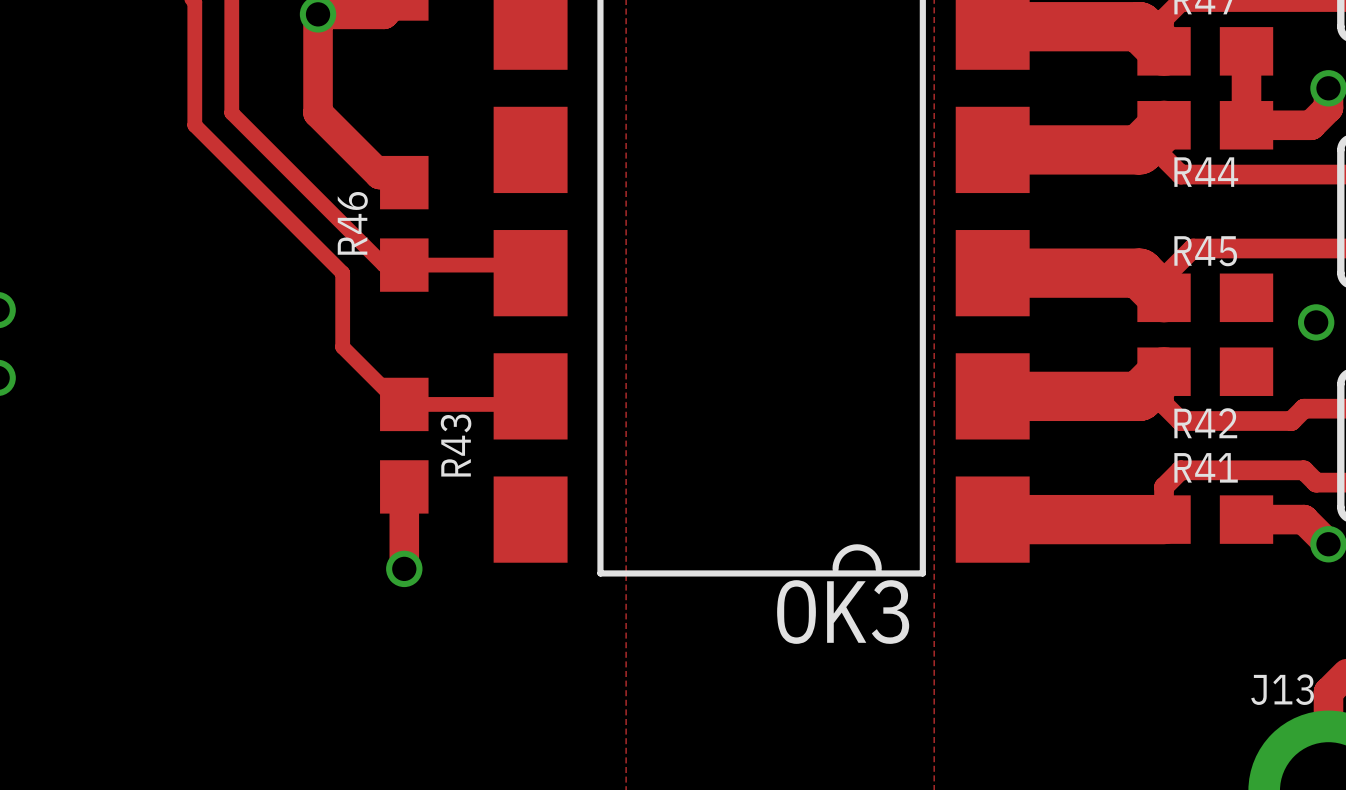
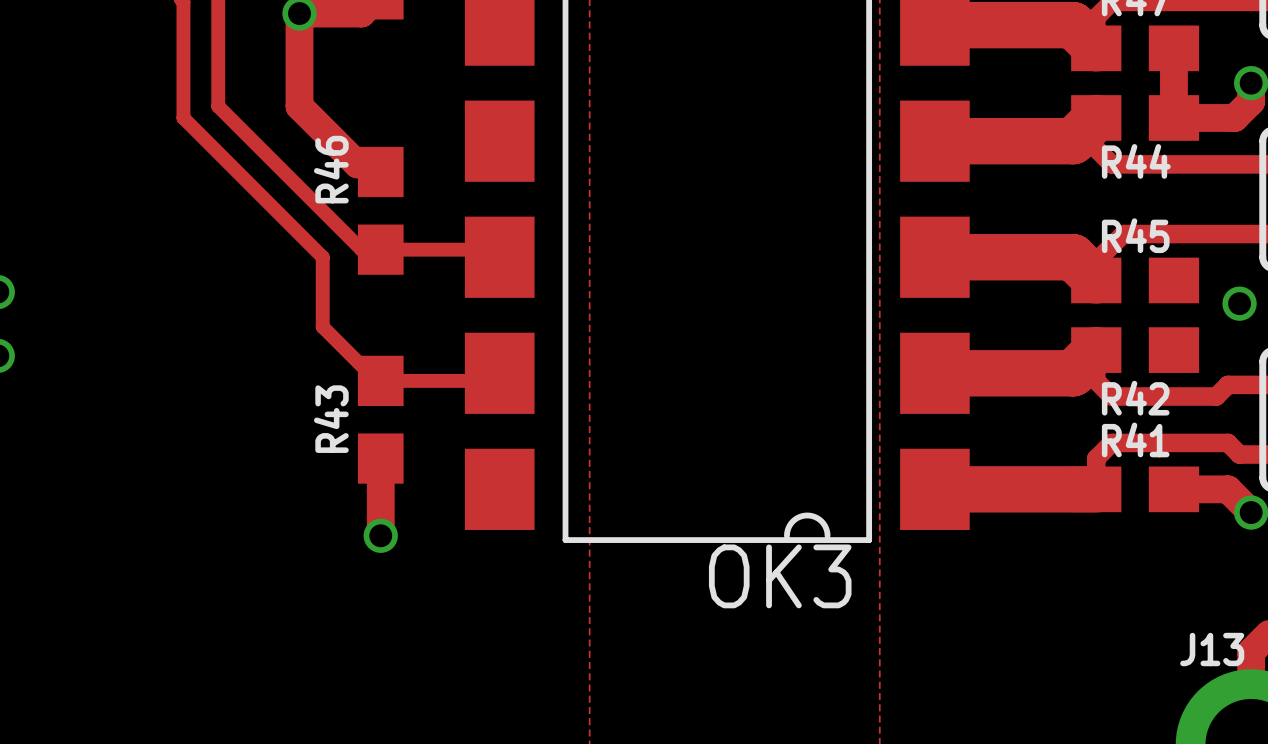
R46 name position: R46 (352, 223) -> R46 (331, 169)
R43 name position: R43 (456, 445) -> R43 (331, 419)

